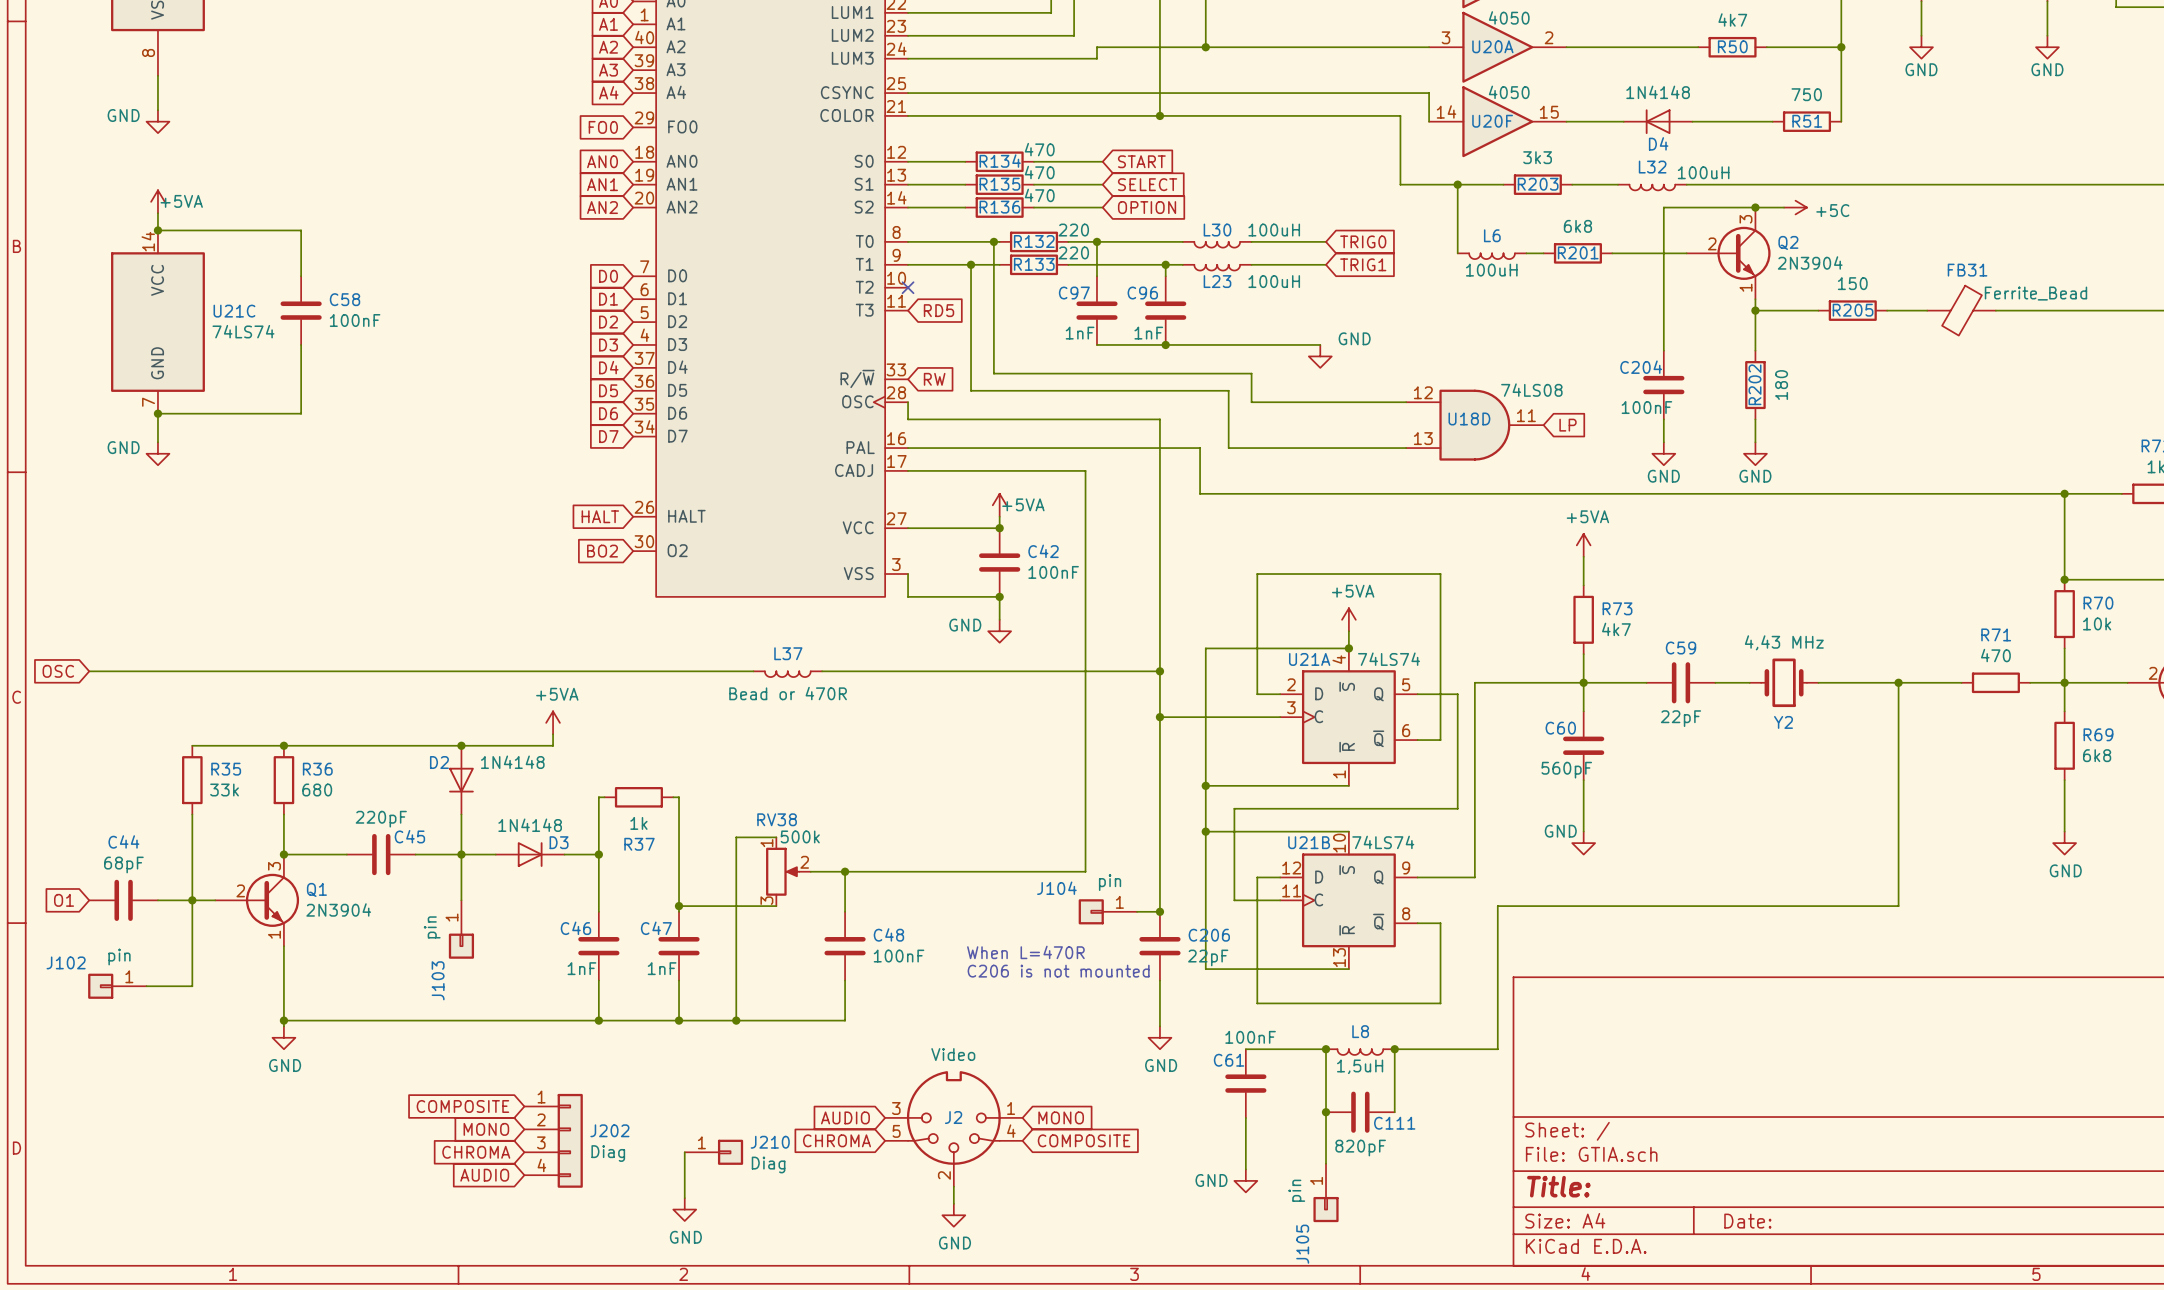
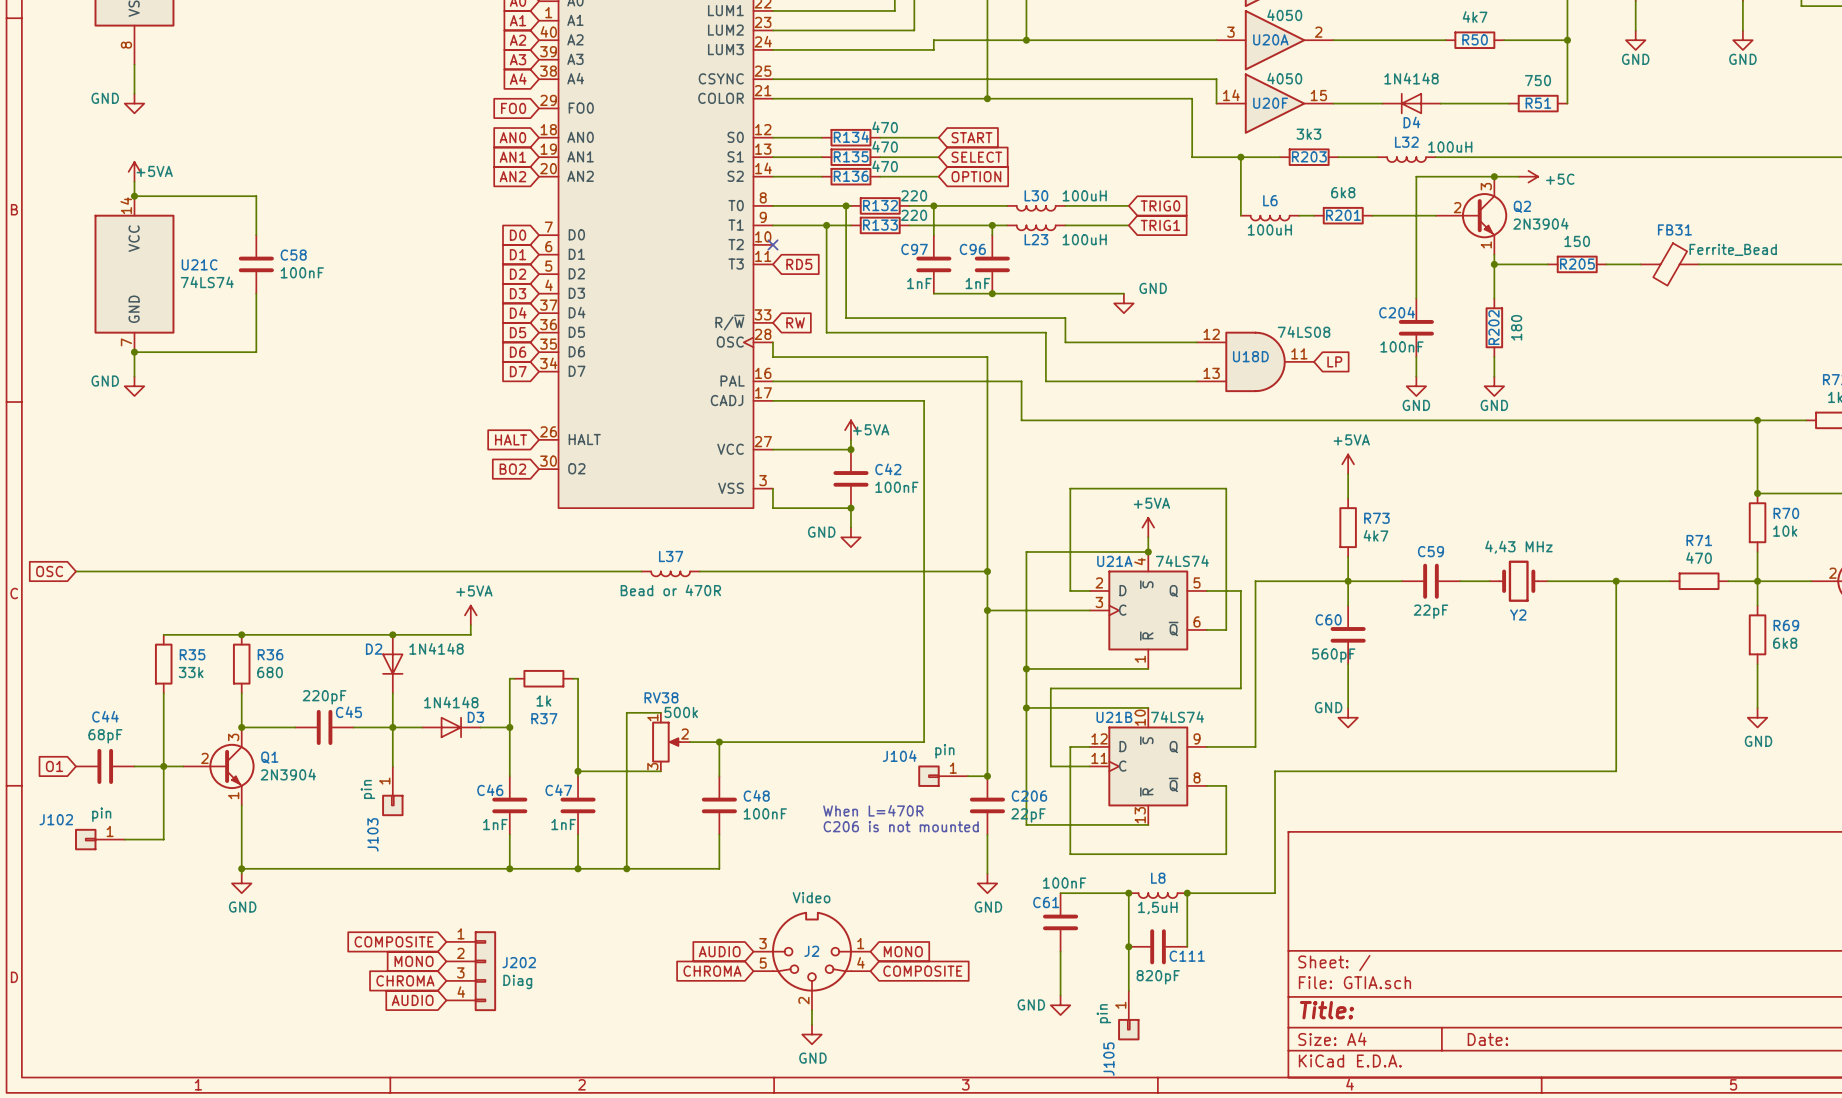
wire: (684, 1152) (684, 1198) -> none
J210: Diag (713, 1152) -> none
power symbol: GND (684, 1209) -> none

